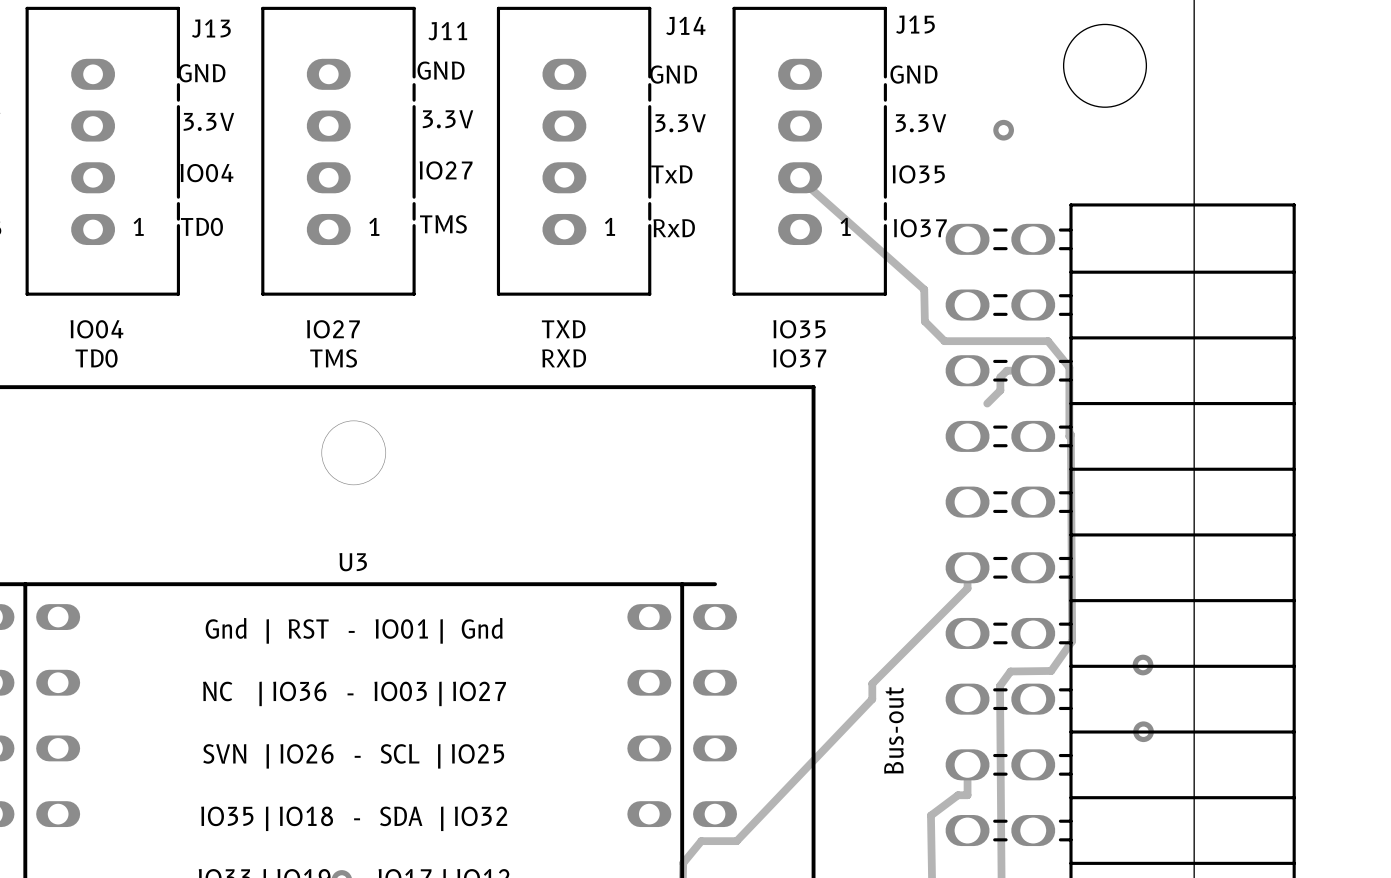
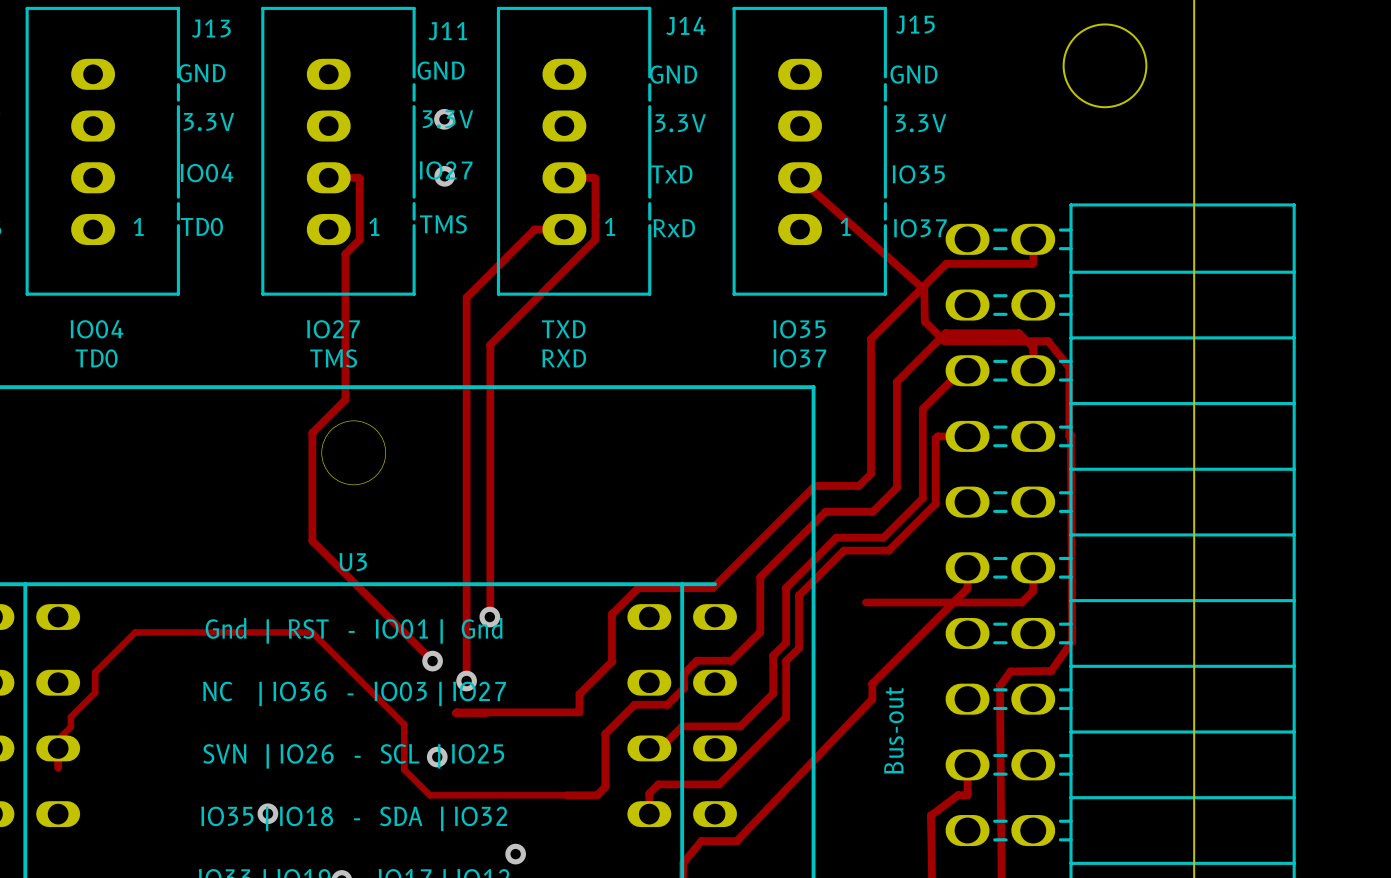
via: none -> (444, 119)
via: (1003, 130) -> none
via: none -> (444, 176)
track: none -> (328, 177) (359, 179) (359, 239) (345, 254) (345, 399) (312, 432) (312, 540) (432, 661)
track: none -> (564, 177) (595, 179) (595, 239) (490, 344) (489, 617)
track: none -> (564, 229) (534, 229) (466, 297) (466, 681)
track: none -> (1026, 239) (1033, 239) (1031, 263) (946, 263) (871, 338) (871, 473) (858, 485) (814, 485) (712, 588) (638, 588) (611, 614) (611, 661) (579, 694) (579, 712) (456, 712) (486, 712)
track: none -> (967, 370) (961, 370) (922, 408) (922, 498) (883, 537) (836, 537) (786, 587) (786, 642) (773, 655) (773, 693) (740, 726) (682, 726) (660, 748) (649, 748)
track: (1033, 370) (1006, 370) (1000, 377) (1000, 390) (987, 403) -> (1033, 370) (1033, 347) (1019, 333) (945, 333) (896, 381) (896, 487) (872, 511) (825, 511) (760, 577) (760, 632) (731, 660) (696, 660) (683, 673) (683, 688) (667, 704) (634, 704) (605, 733) (605, 787) (597, 795) (429, 795) (404, 769) (404, 724) (312, 632) (135, 632) (95, 672) (95, 692) (70, 716) (70, 727) (58, 739) (58, 767)
track: none -> (967, 436) (937, 436) (935, 438) (935, 503) (888, 550) (843, 550) (799, 595) (799, 648) (786, 661) (786, 717) (719, 784) (658, 784) (649, 793) (649, 814)
track: none -> (1033, 567) (1033, 591) (1021, 602) (865, 602)
via: none -> (489, 617)
via: none -> (432, 661)
via: (1143, 665) -> none
via: none -> (466, 681)
via: (1143, 731) -> none
via: none -> (437, 757)
via: none -> (267, 813)
via: none -> (515, 854)

